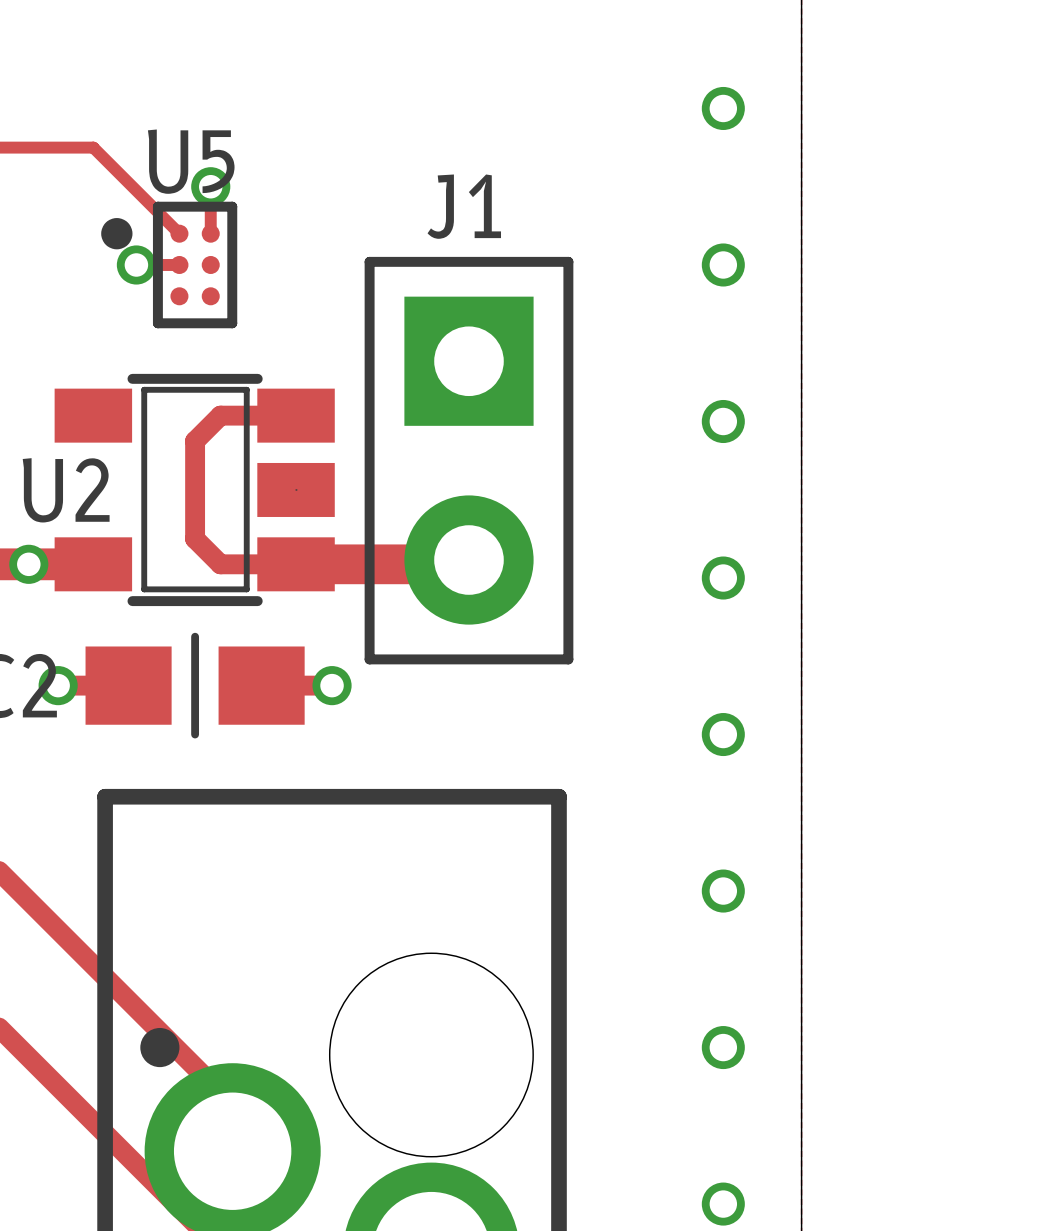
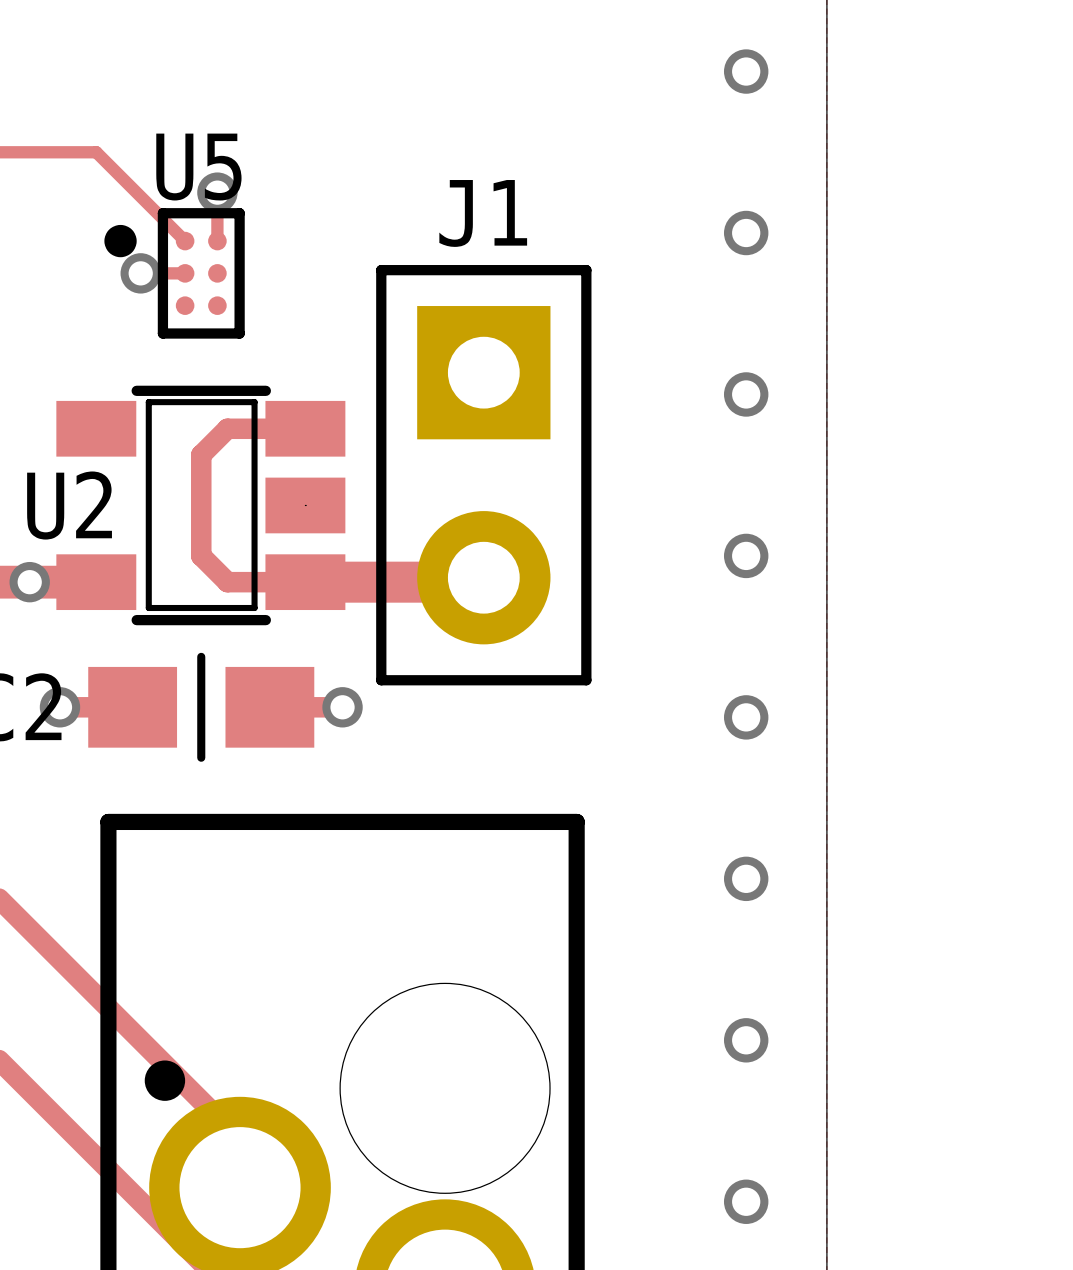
via position: (723, 108) -> (746, 71)
via position: (723, 264) -> (746, 233)
via position: (723, 421) -> (746, 394)
via position: (723, 578) -> (746, 555)
via position: (723, 734) -> (746, 717)
via position: (723, 891) -> (746, 878)
via position: (723, 1047) -> (746, 1040)
via position: (723, 1204) -> (746, 1201)

